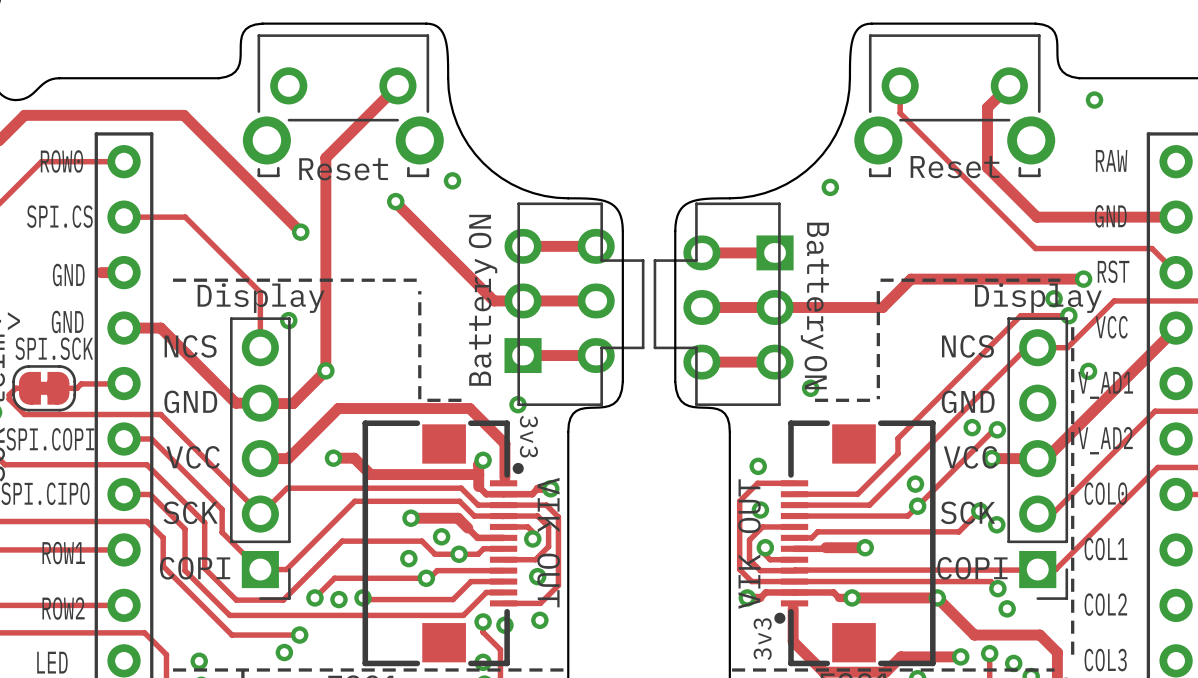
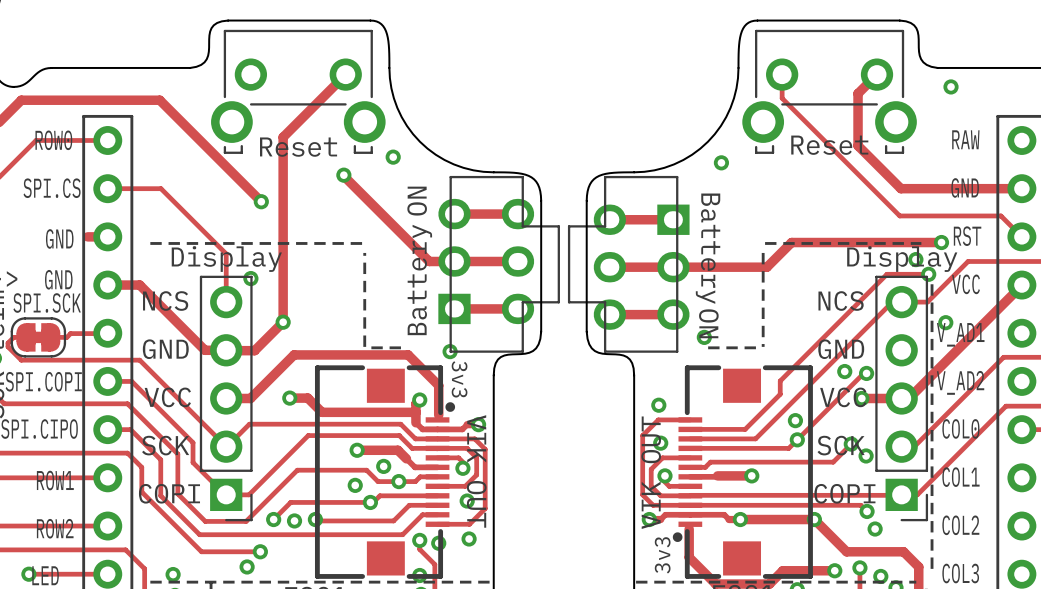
track: none -> (28, 574) (107, 574)
via: none -> (28, 574)

